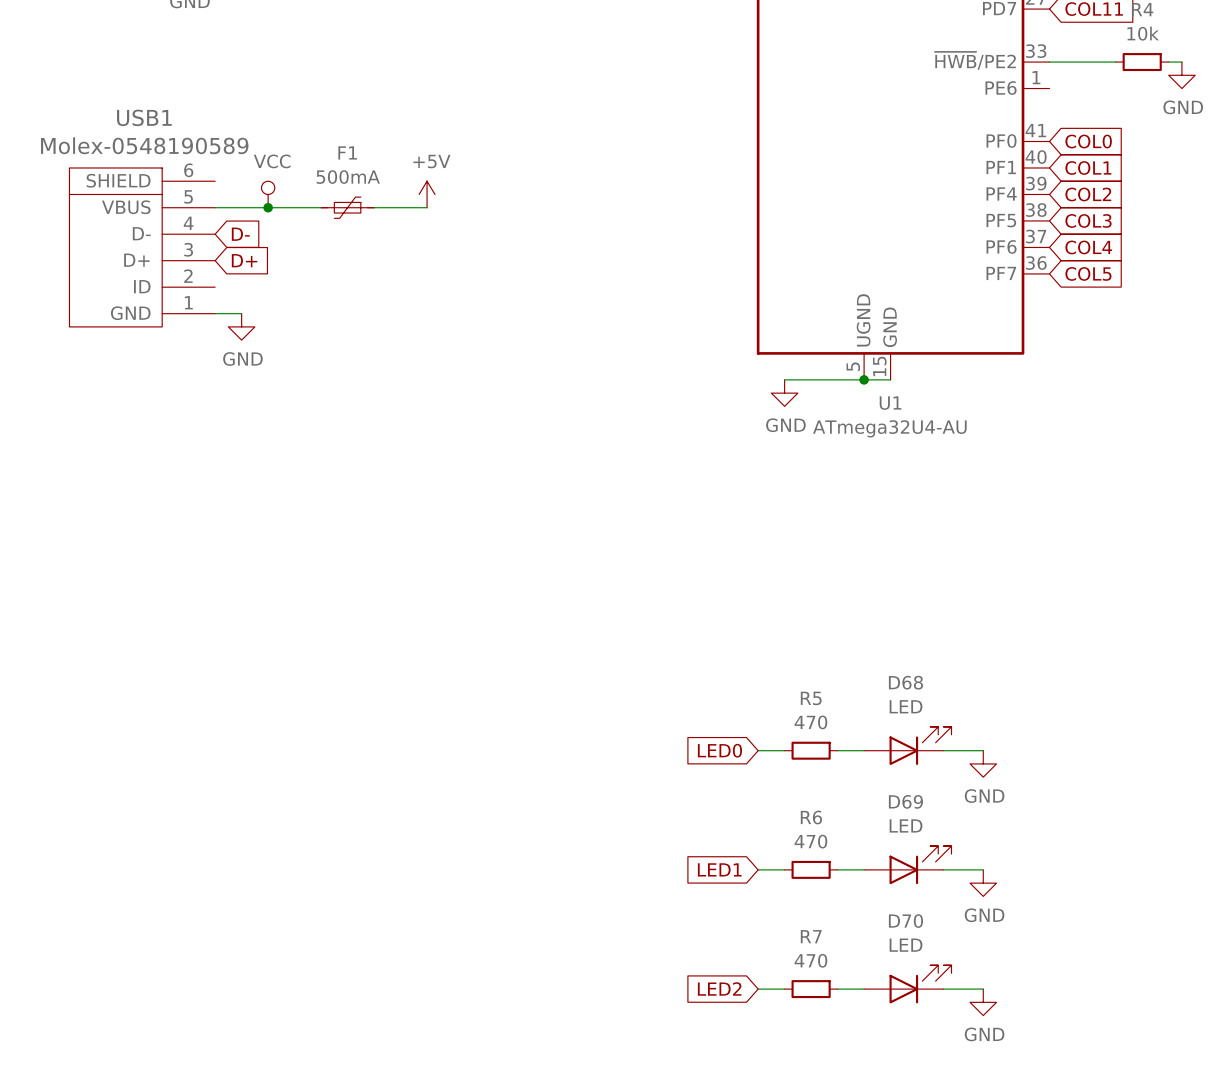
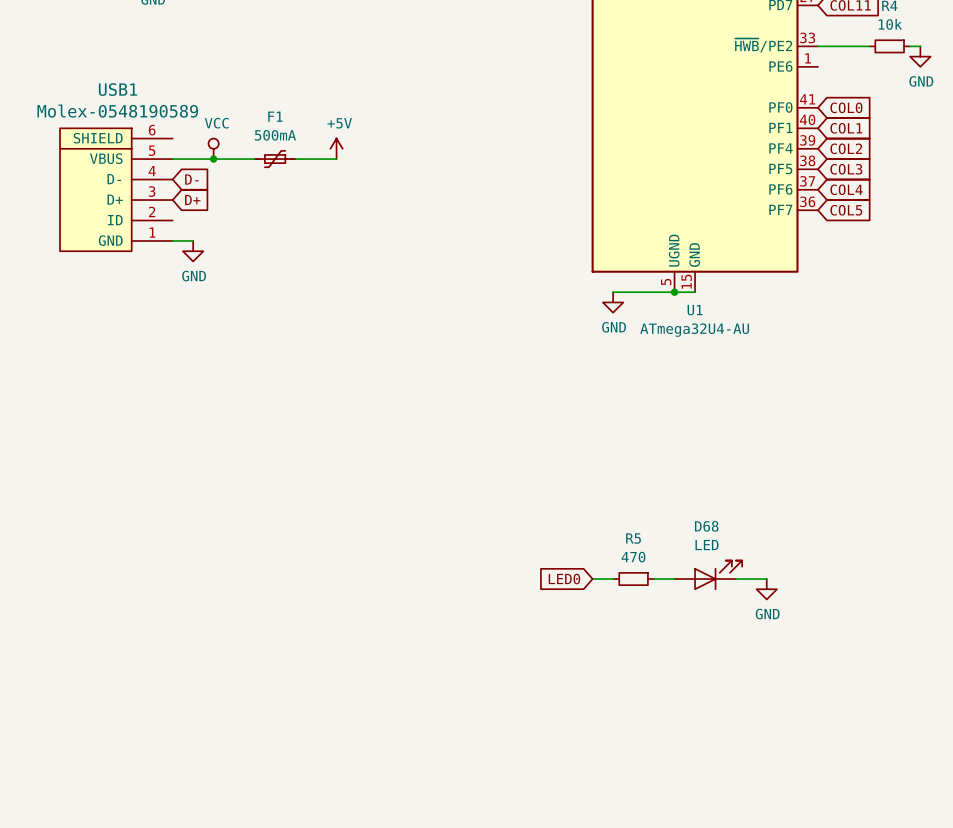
D69: LED (907, 865) -> none
global label: LED1 (719, 869) -> none
wire: (758, 869) (784, 869) -> none
R6: 470 (811, 869) -> none
wire: (837, 869) (864, 869) -> none
wire: (943, 869) (983, 869) -> none
power symbol: GND (983, 883) -> none
D70: LED (907, 984) -> none
global label: LED2 (719, 988) -> none
wire: (758, 989) (784, 989) -> none
R7: 470 (811, 989) -> none
wire: (837, 989) (864, 989) -> none
wire: (943, 989) (983, 989) -> none
power symbol: GND (983, 1002) -> none

